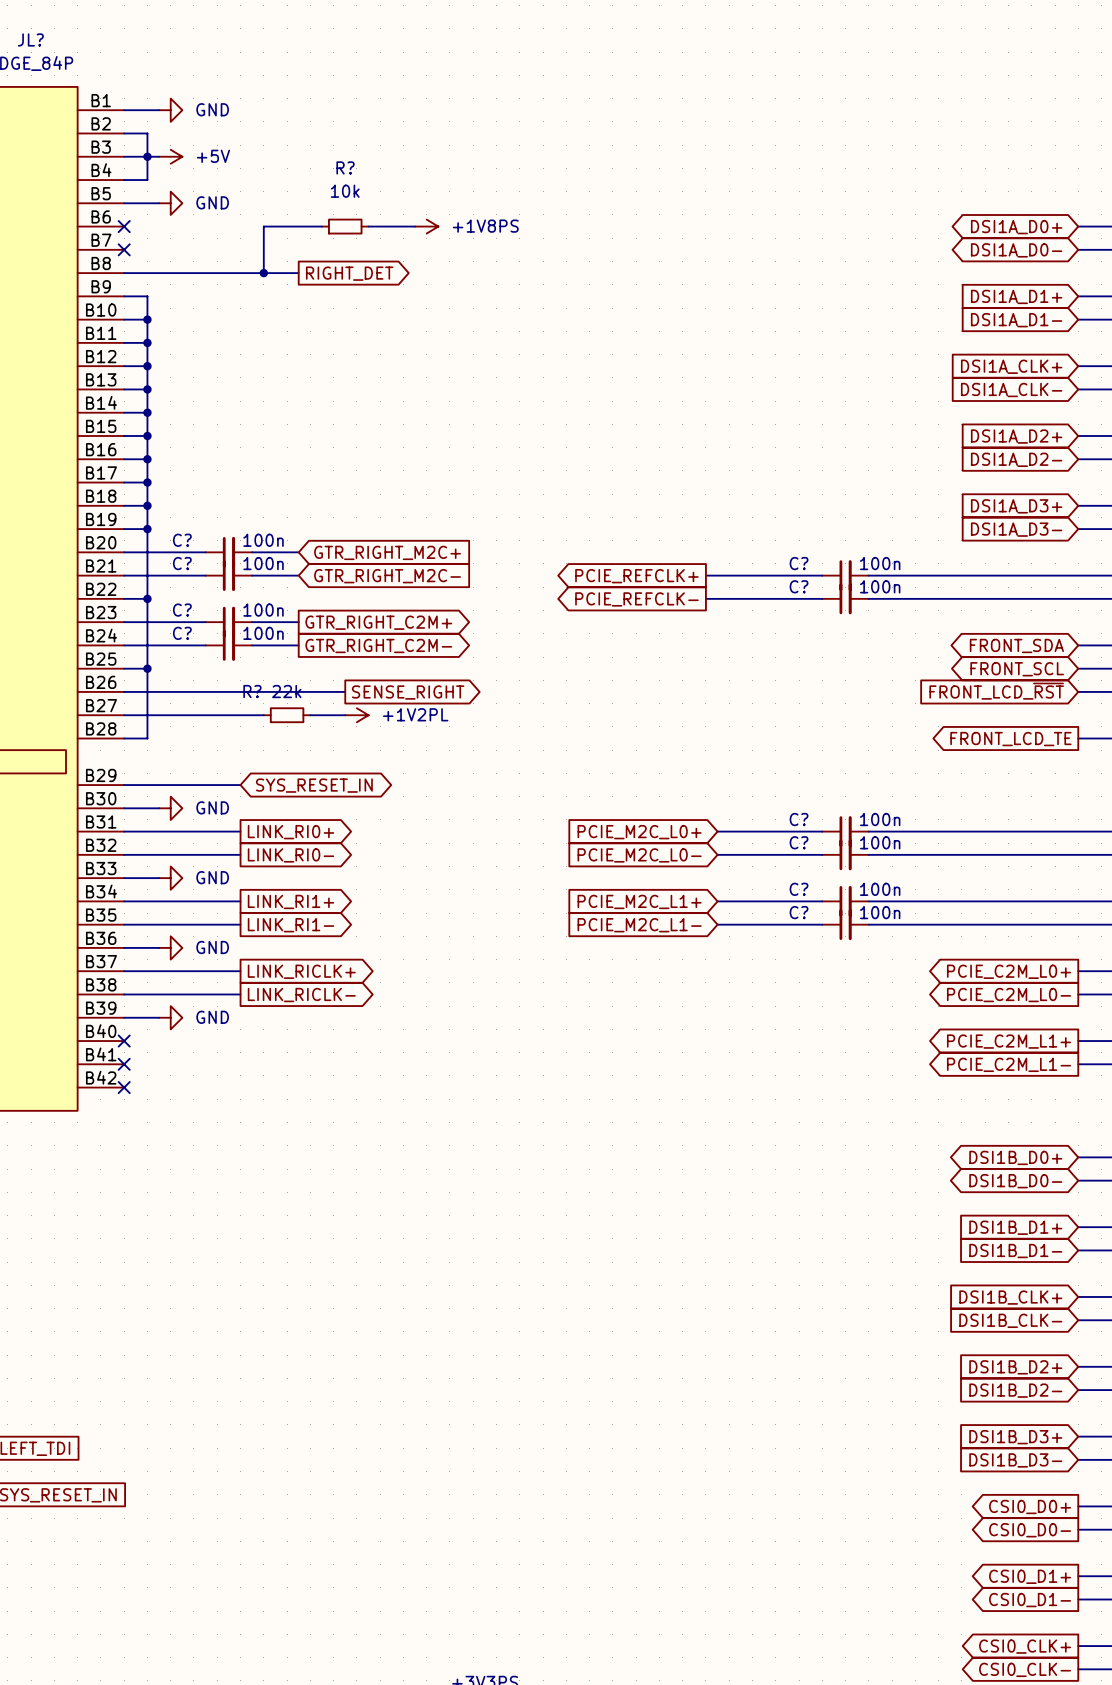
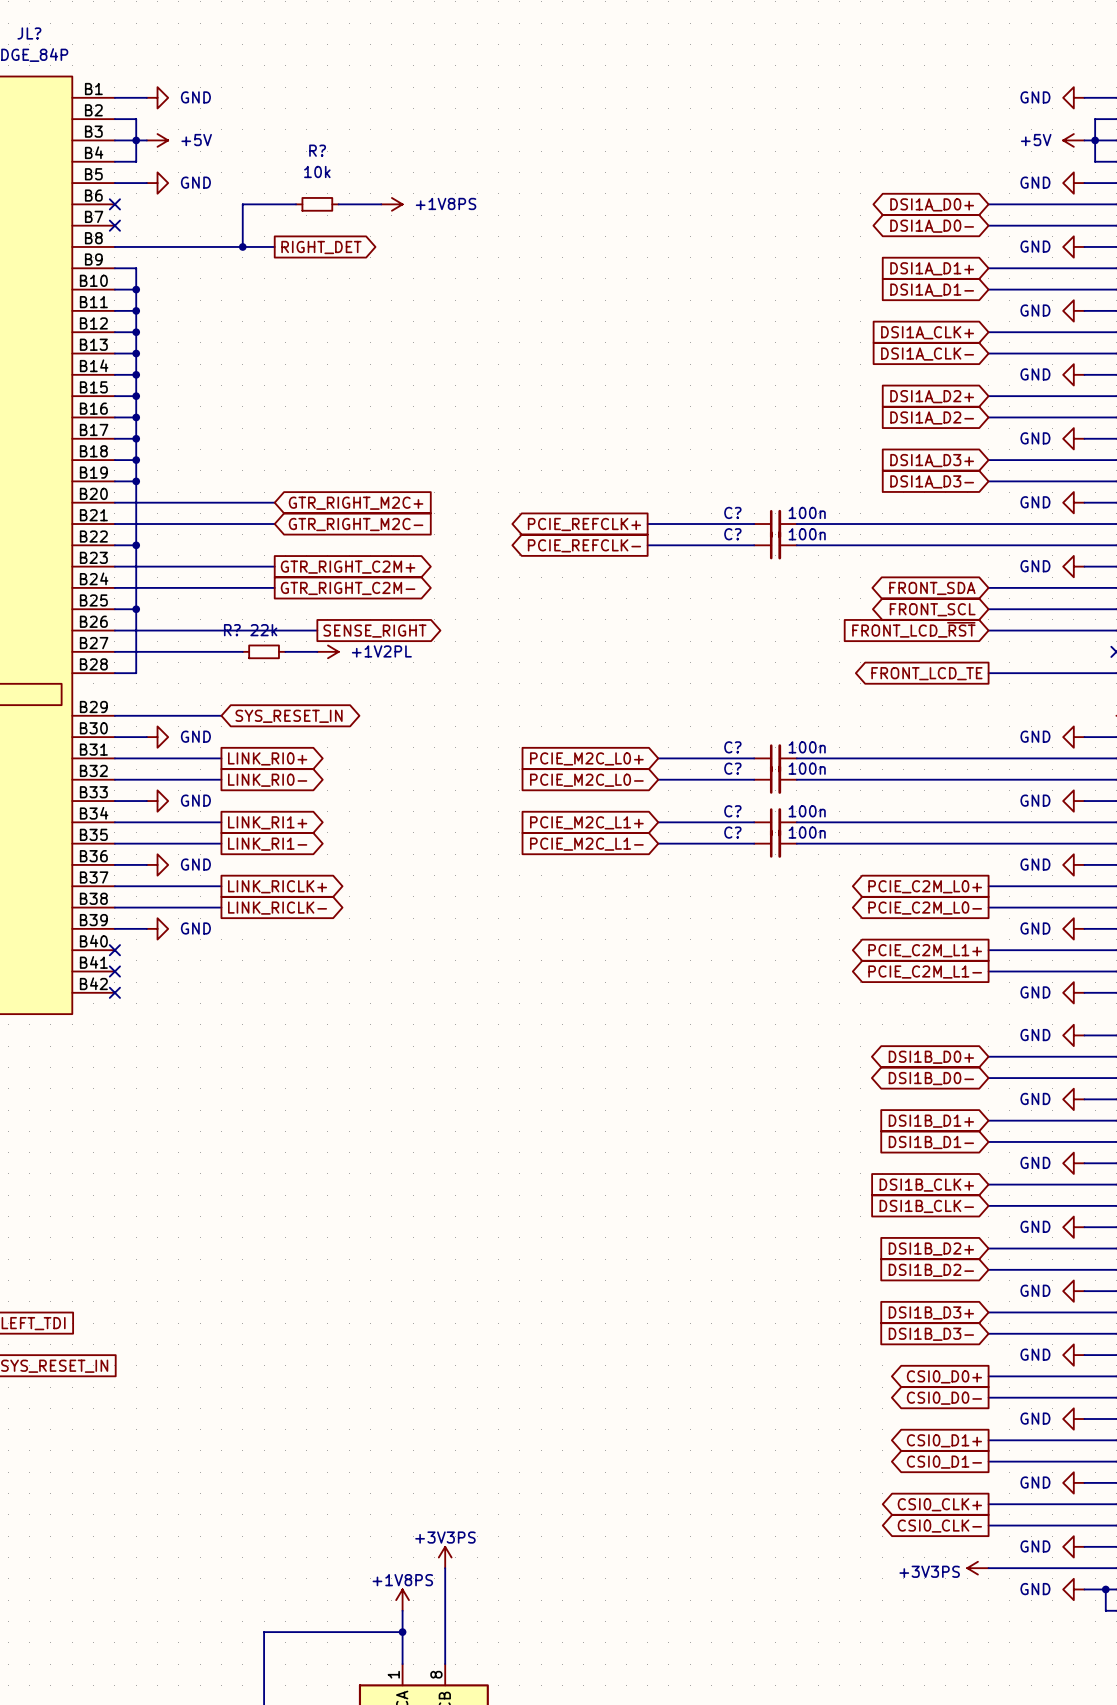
C?: 100n (228, 552) -> none
C?: 100n (228, 575) -> none
C?: 100n (228, 622) -> none
C?: 100n (228, 645) -> none

